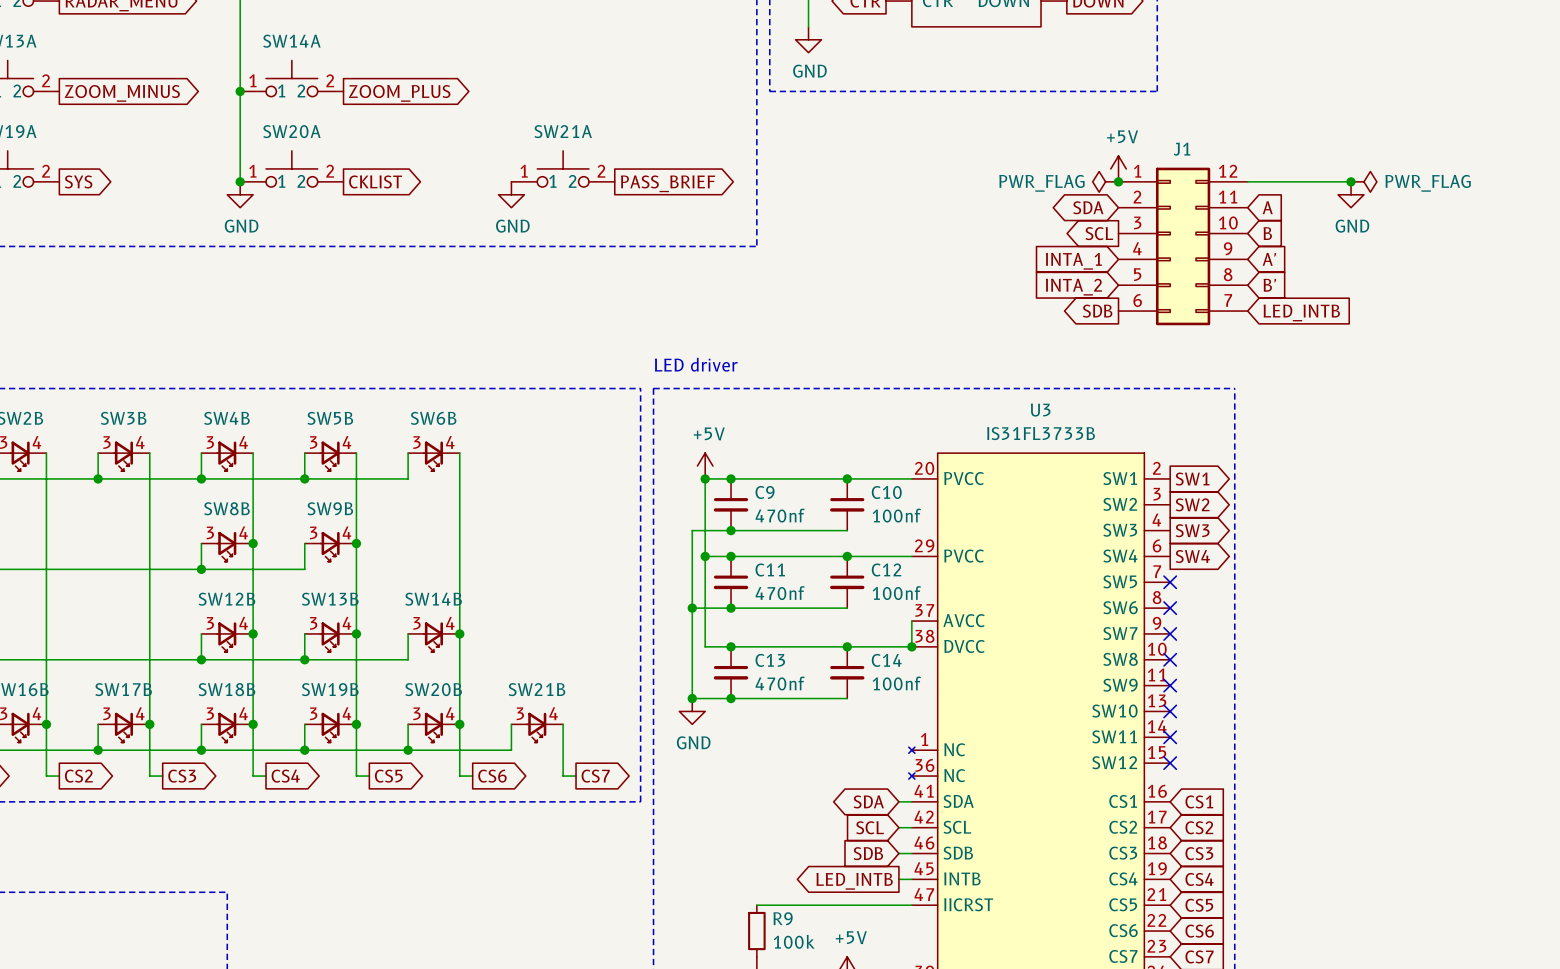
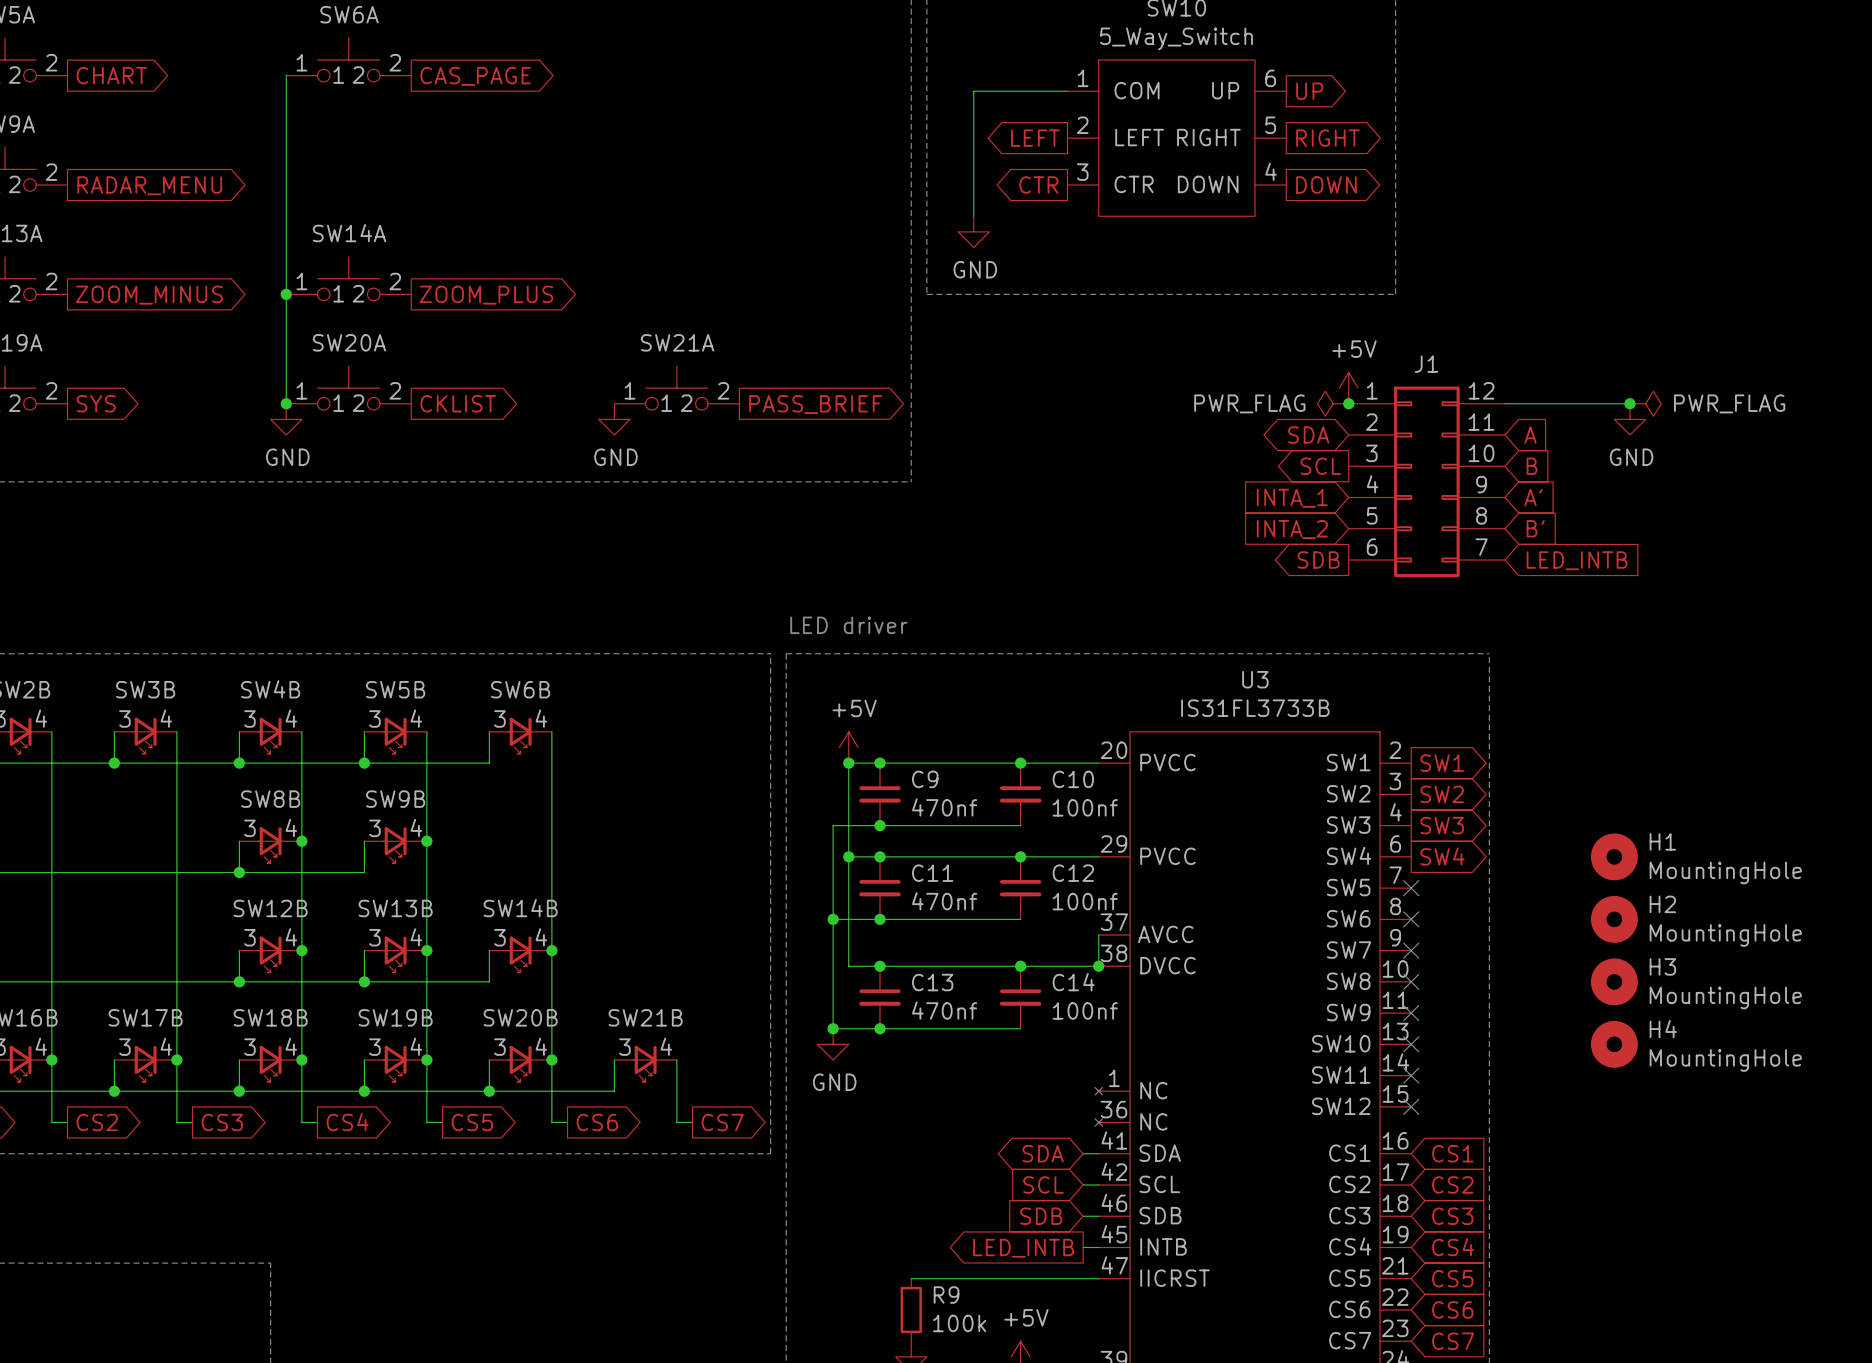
H1: none -> MountingHole (1614, 856)
H2: none -> MountingHole (1614, 919)
H3: none -> MountingHole (1614, 981)
H4: none -> MountingHole (1614, 1044)

